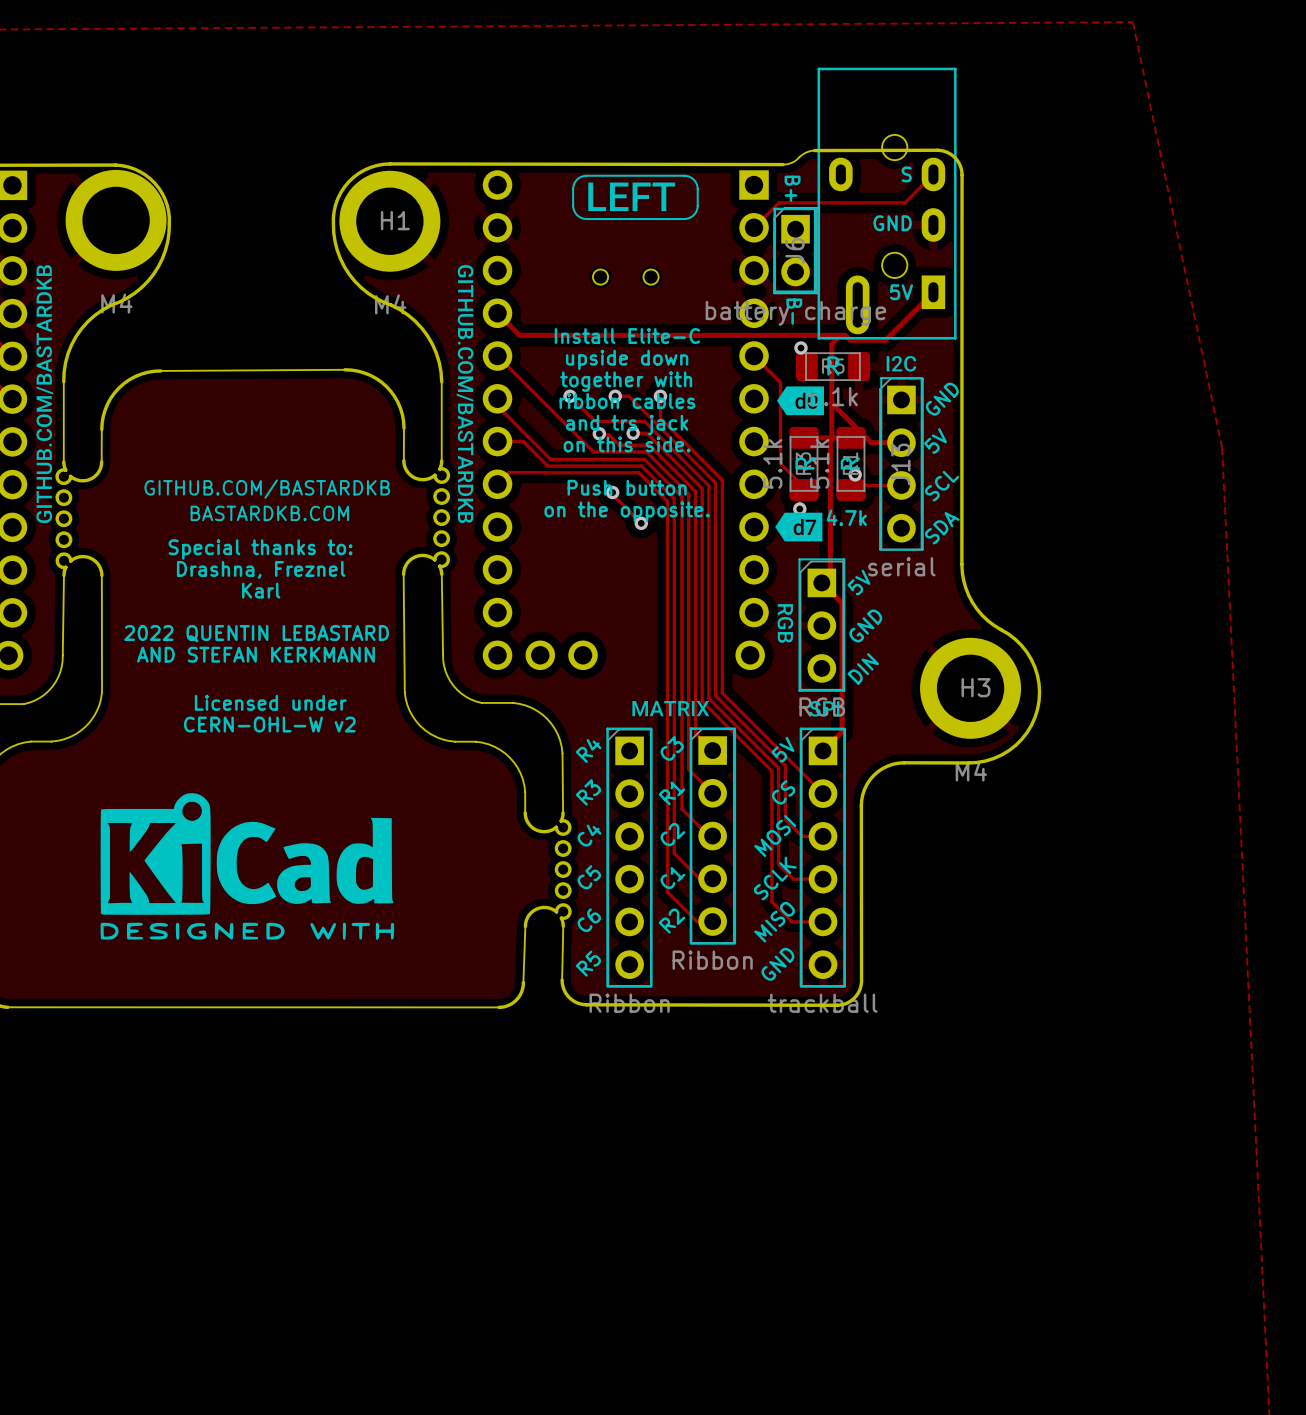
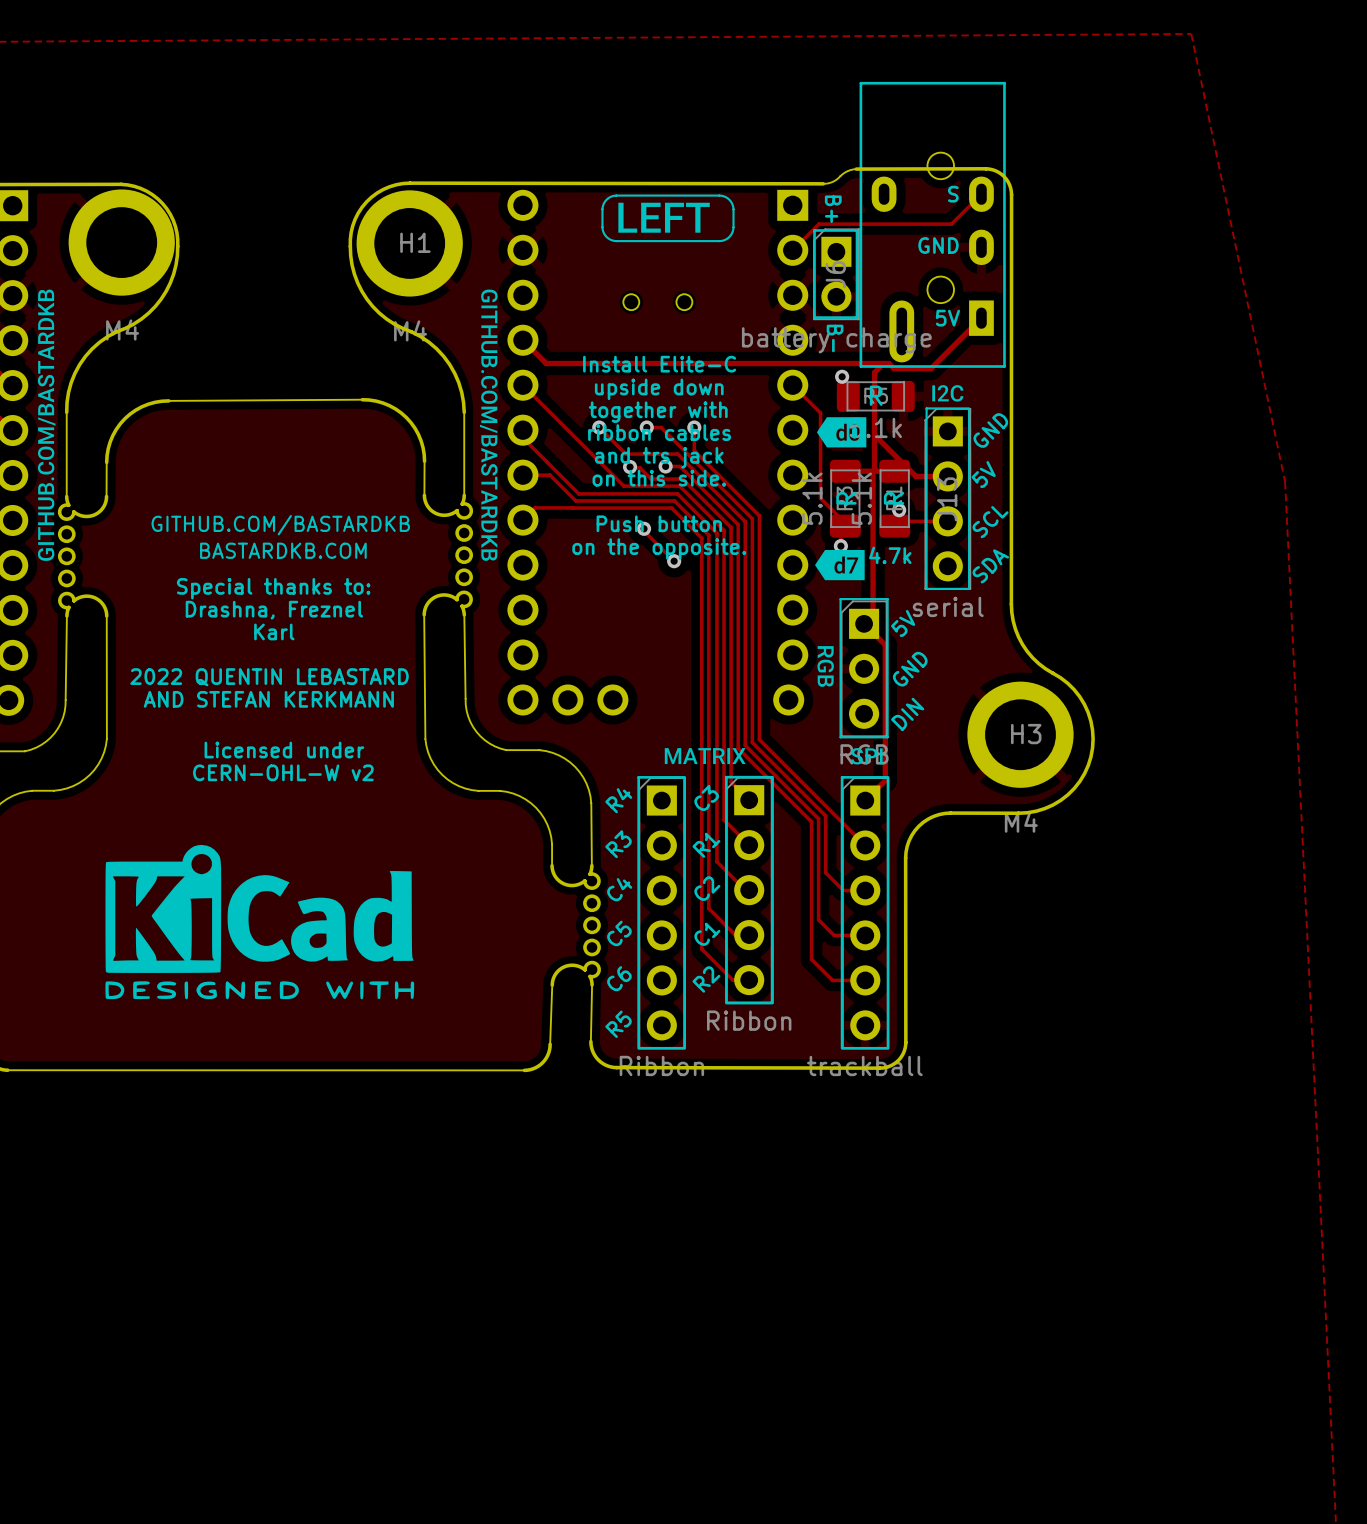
text: 5V (782, 749) -> none
text: CS (783, 792) -> none
text: MOSI (775, 836) -> none
text: SCLK (775, 878) -> none
text: MISO (774, 922) -> none
text: GND (777, 964) -> none

